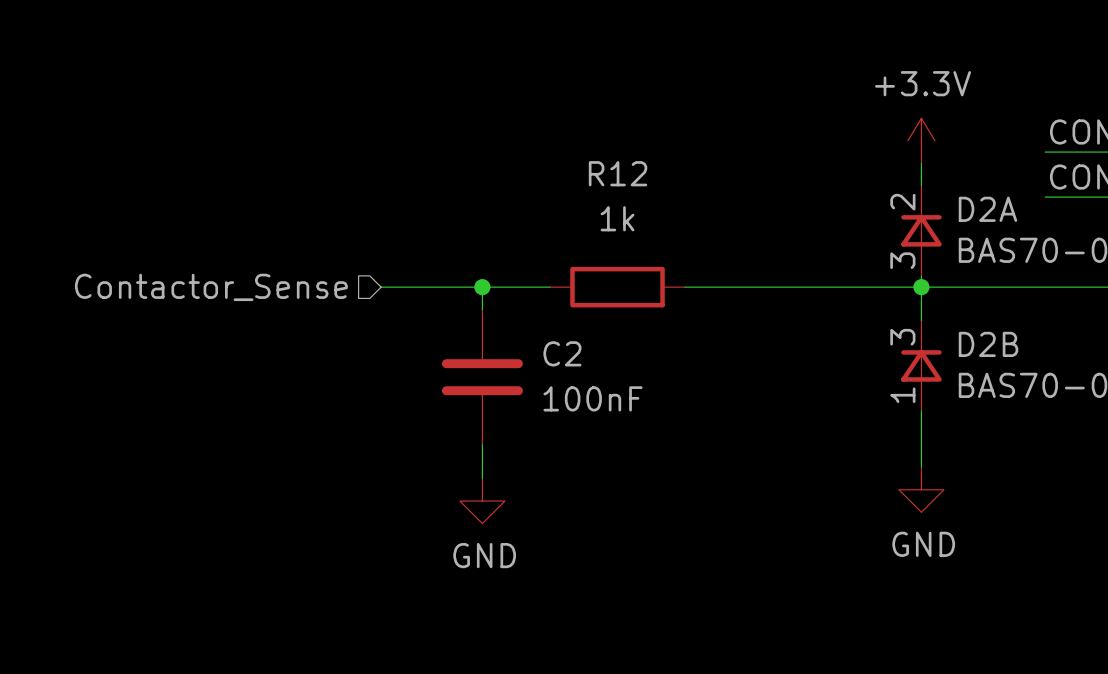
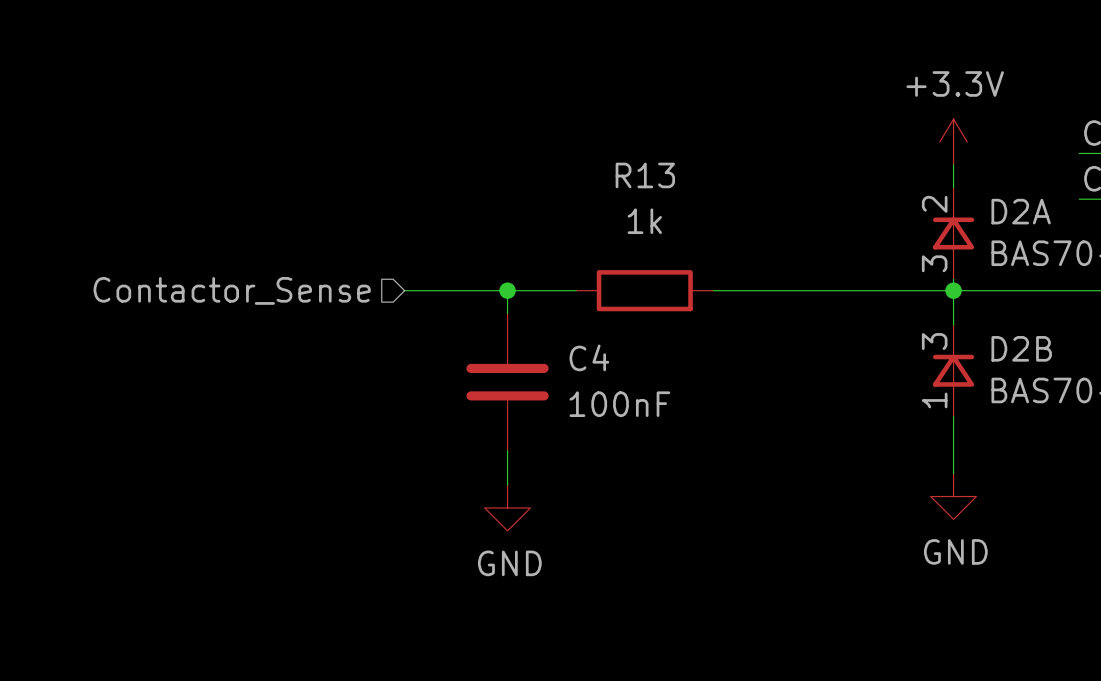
R12 name: R12 (618, 173) -> R13 (645, 175)
C2 name: C2 (562, 353) -> C4 (589, 357)

